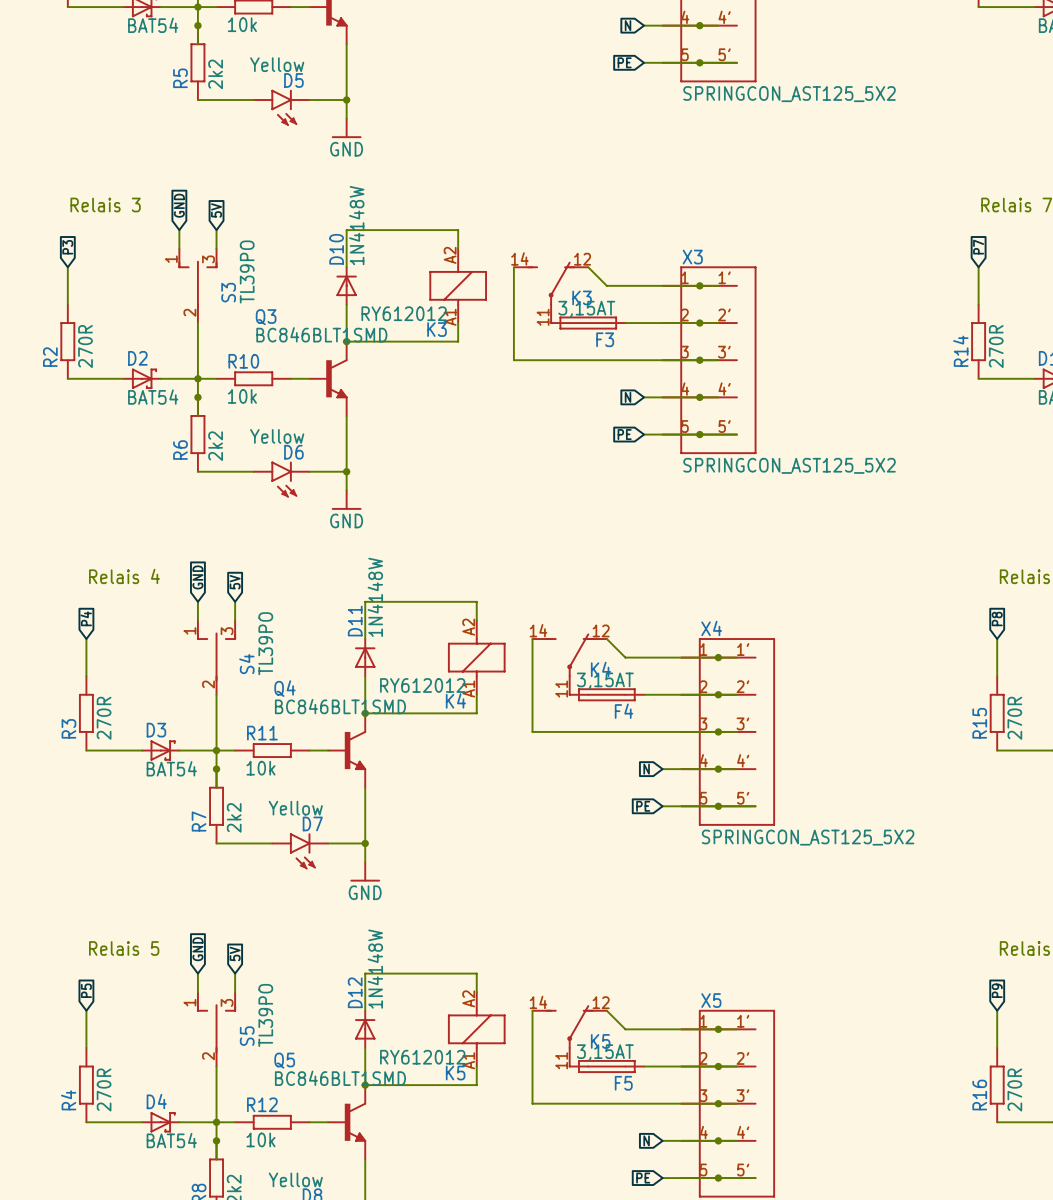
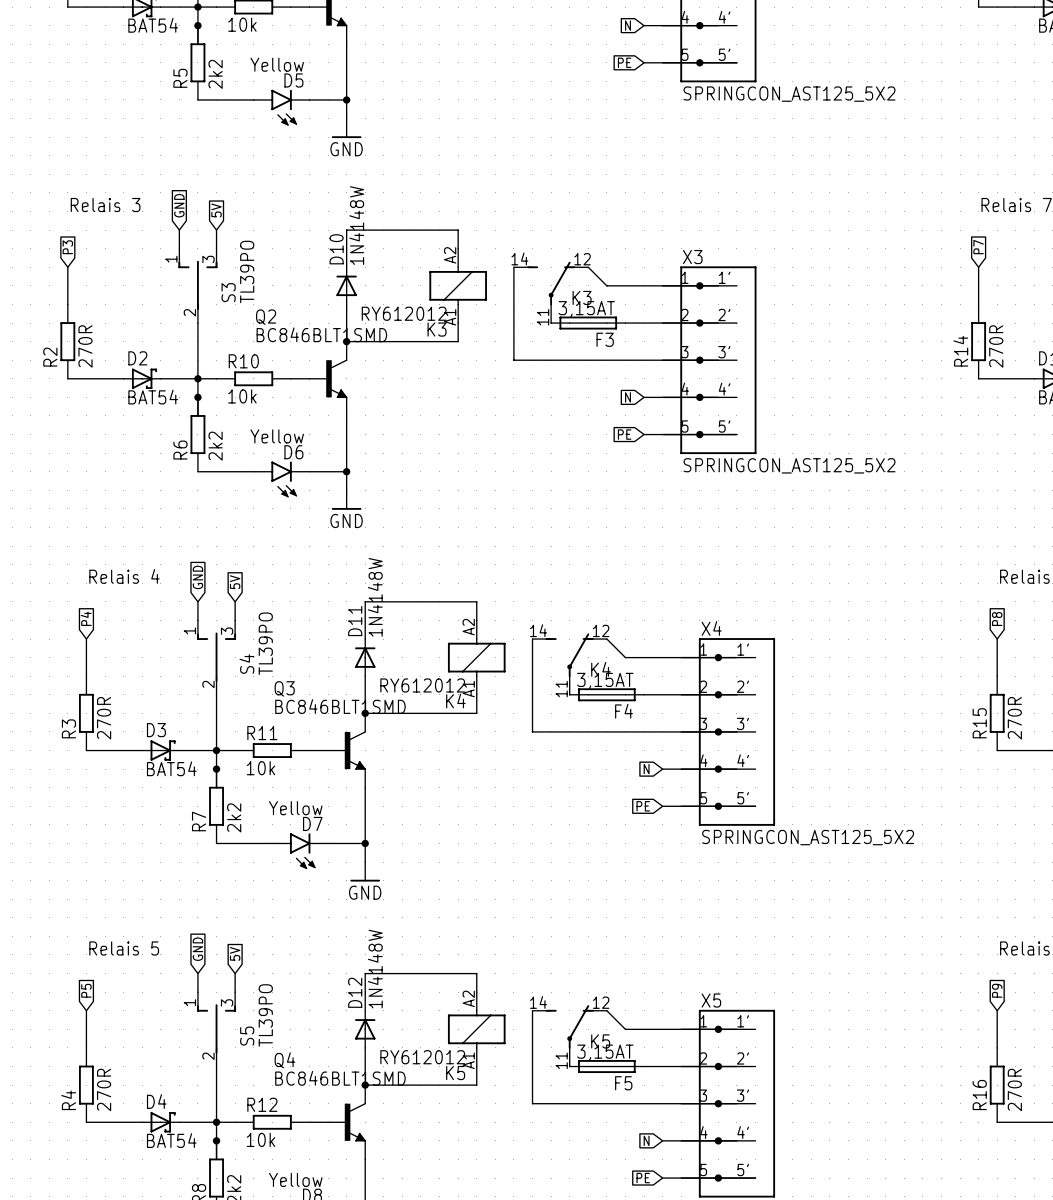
Q3 name: Q3 (266, 317) -> Q2 (266, 317)
Q4 name: Q4 (284, 688) -> Q3 (284, 688)
Q5 name: Q5 (284, 1060) -> Q4 (284, 1060)

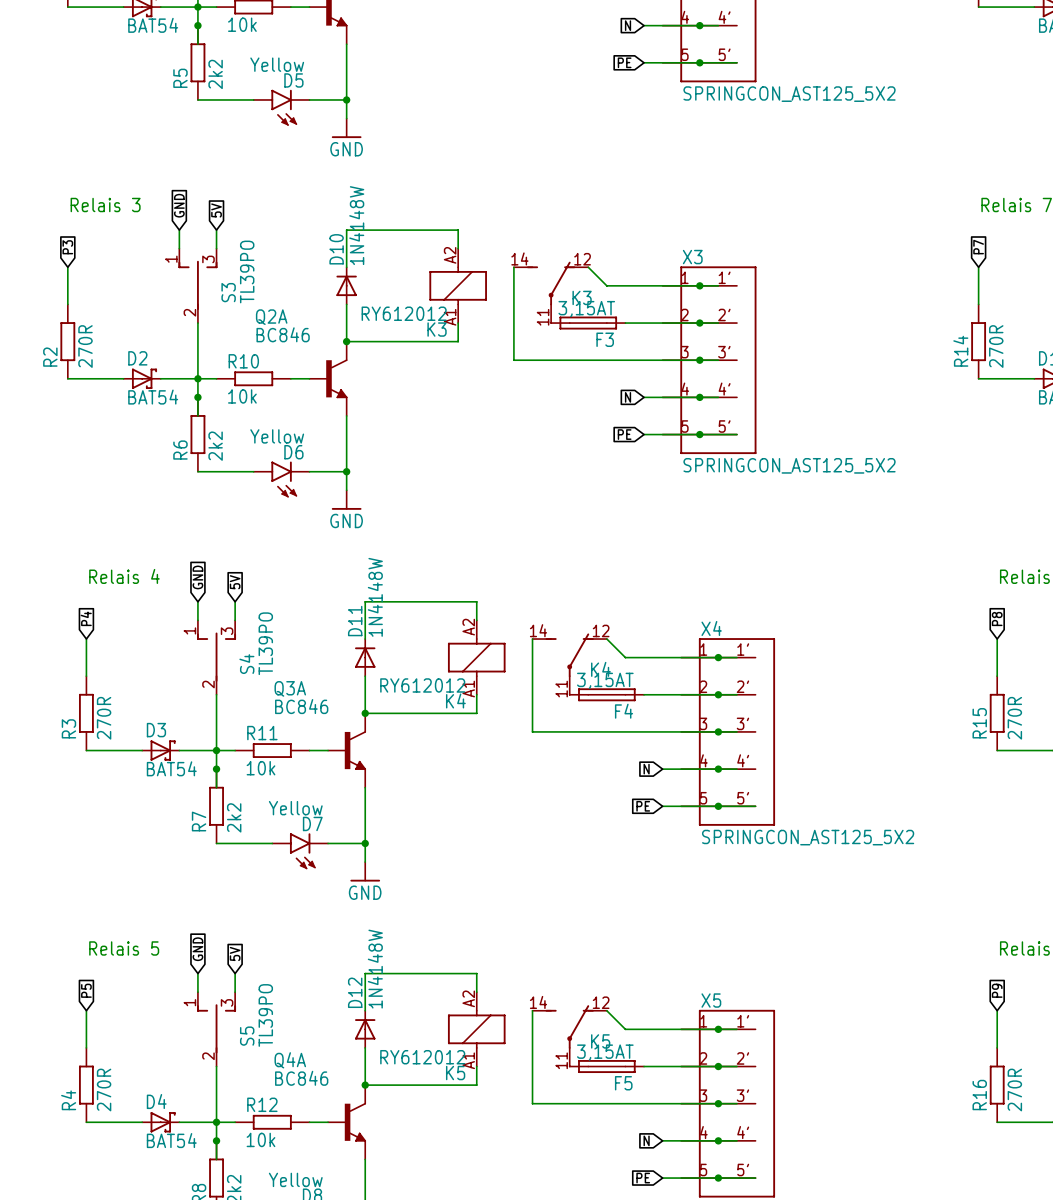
Q2 name: Q2 (266, 317) -> Q2A (271, 317)
Q2 value: BC846BLT1SMD (321, 334) -> BC846 (283, 334)
Q3 name: Q3 (284, 688) -> Q3A (290, 688)
Q3 value: BC846BLT1SMD (340, 706) -> BC846 (301, 706)
Q4 name: Q4 (284, 1060) -> Q4A (290, 1060)
Q4 value: BC846BLT1SMD (340, 1078) -> BC846 (301, 1078)

